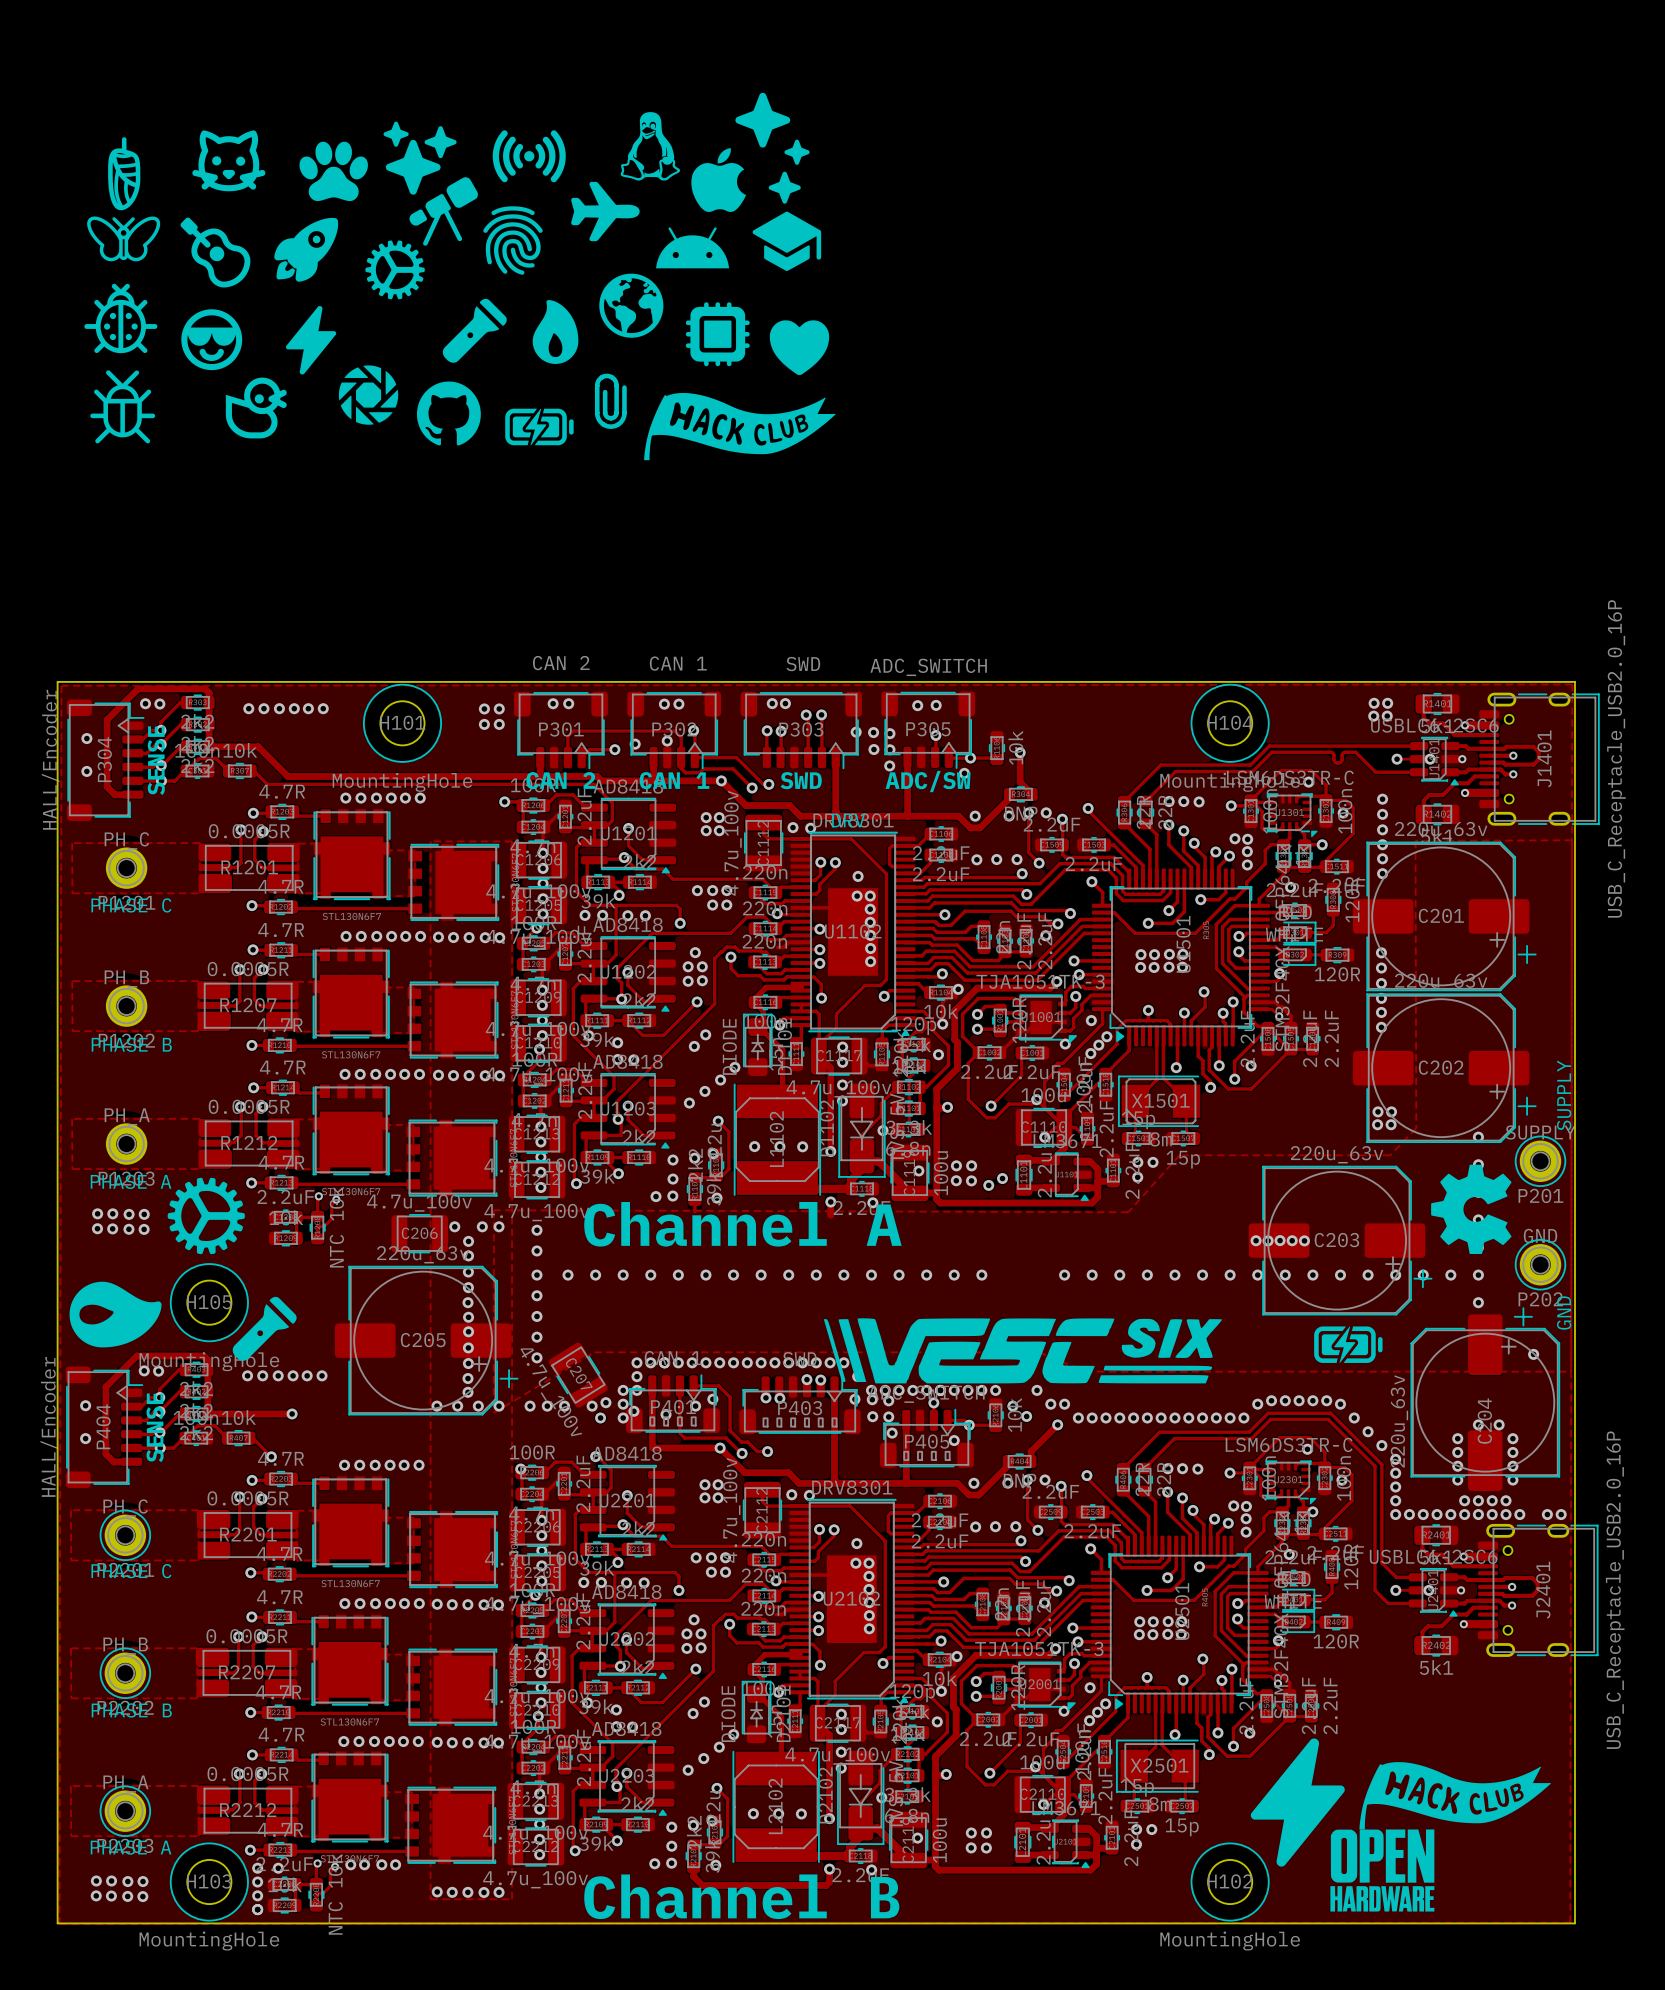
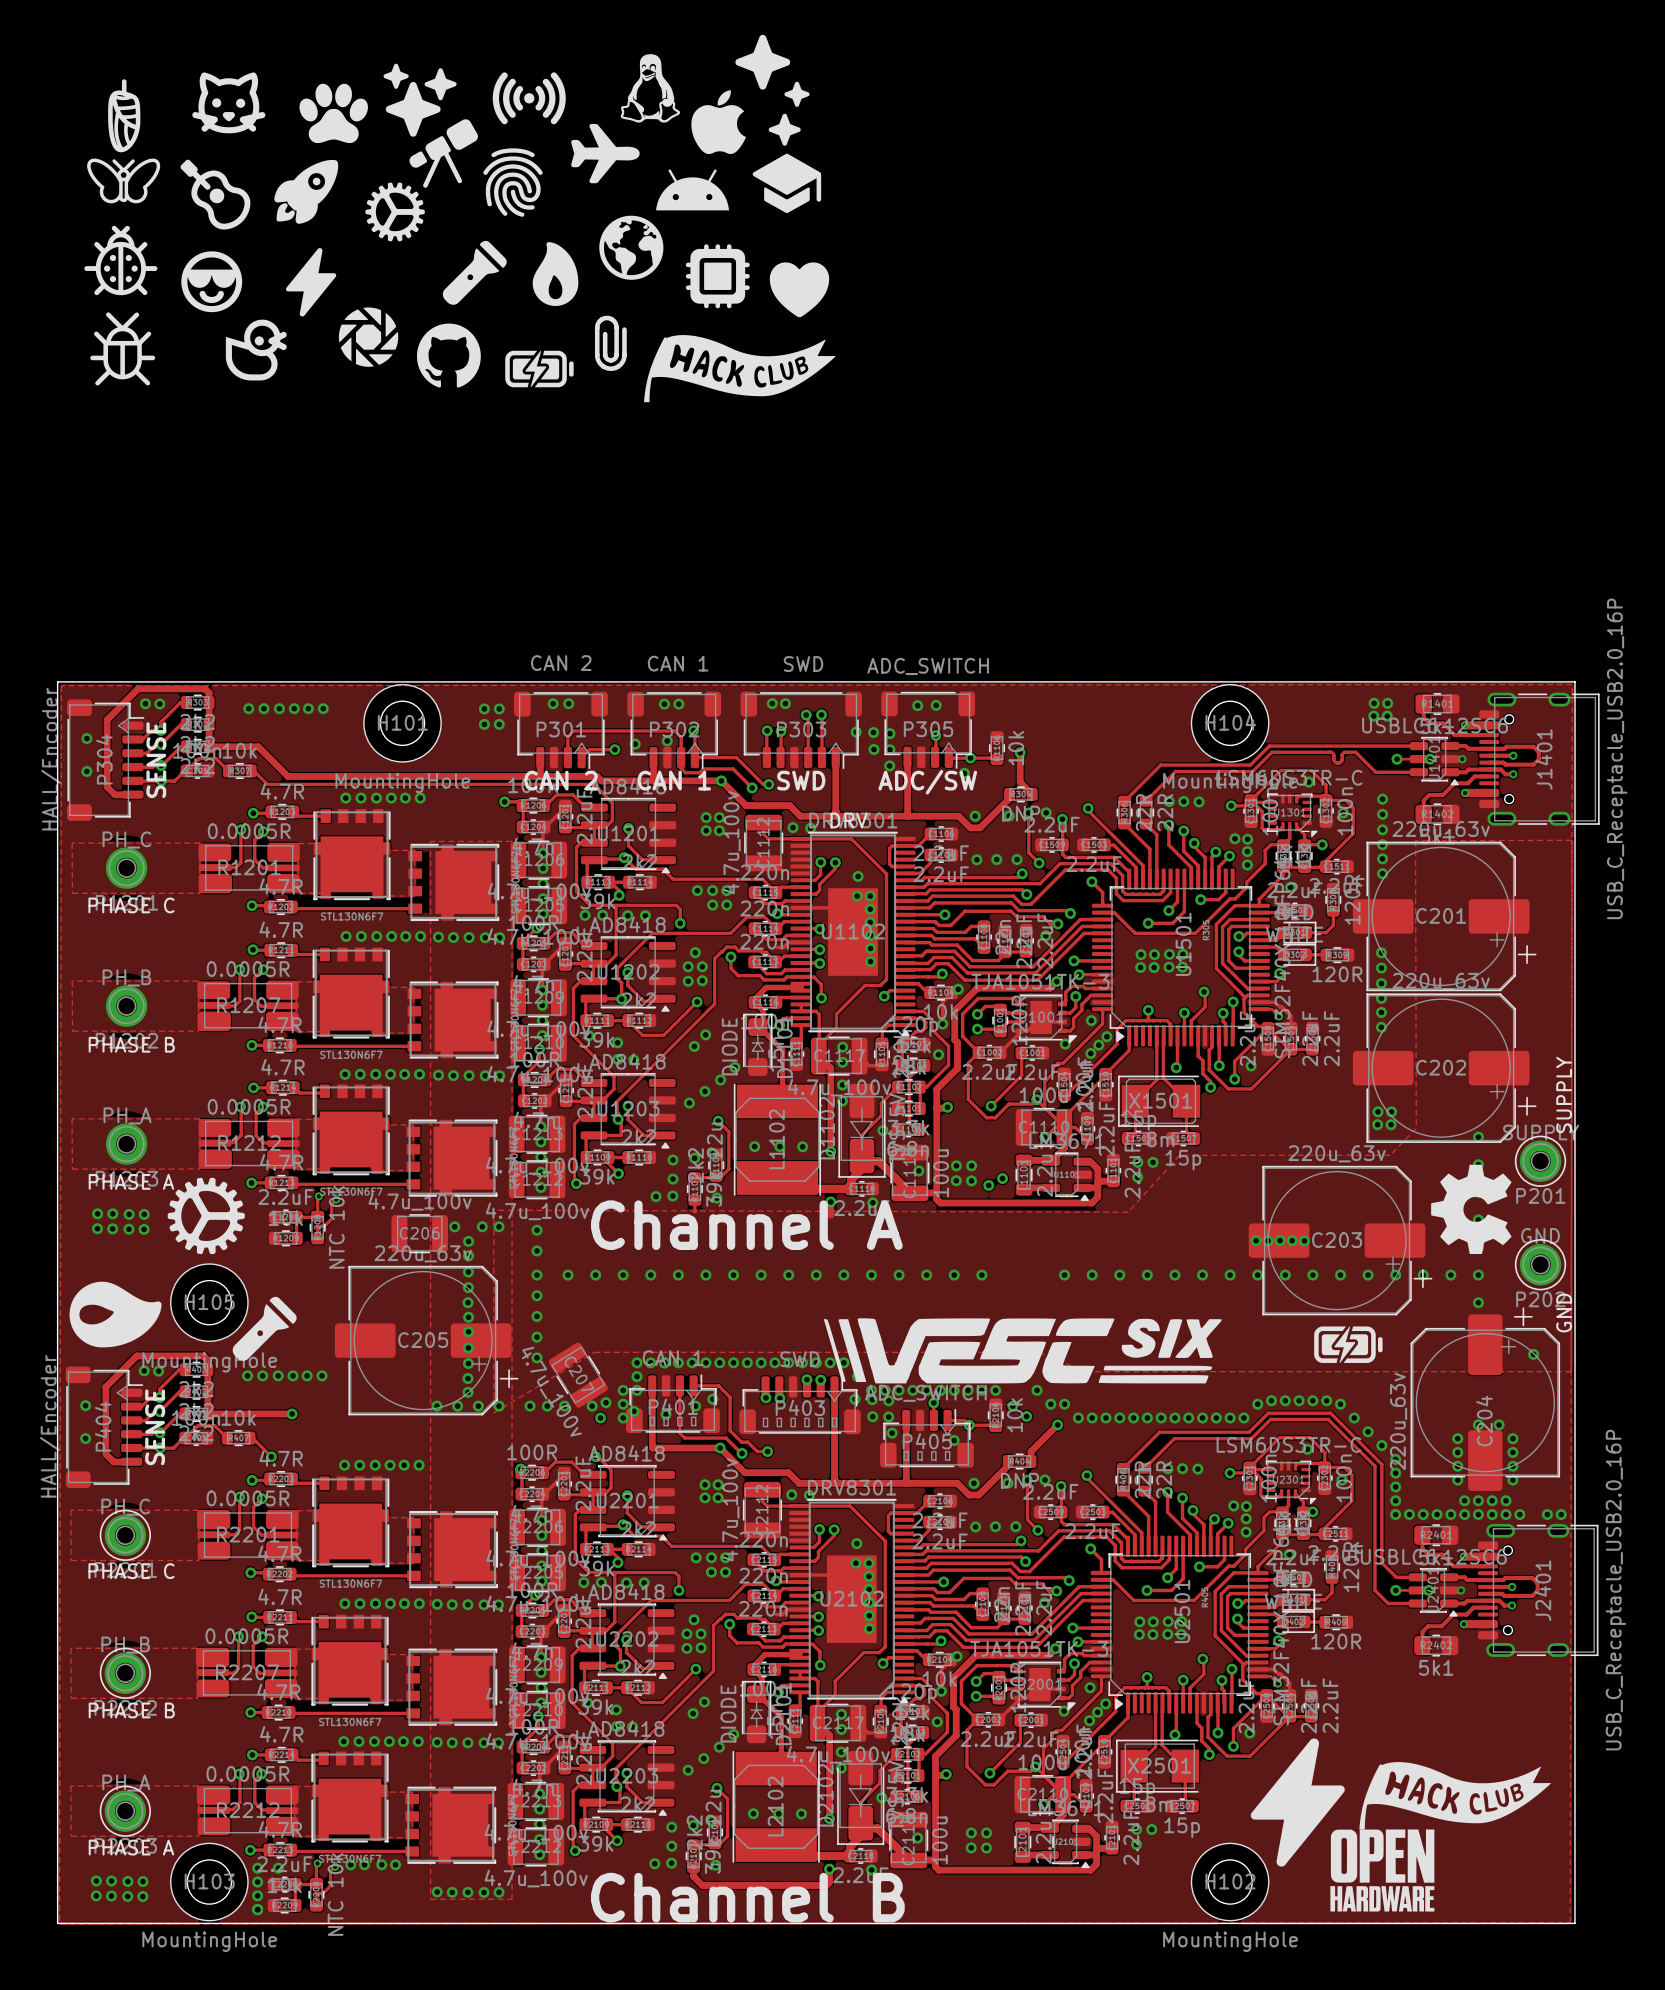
drawing: none -> [212, 98, 246, 108]
drawing position: (762, 120) -> (762, 62)
drawing position: (396, 134) -> (396, 76)
drawing position: (440, 142) -> (440, 84)
drawing position: (650, 146) -> (650, 88)
drawing position: (797, 152) -> (797, 94)
drawing position: (323, 153) -> (323, 95)
drawing position: (343, 153) -> (343, 95)
drawing position: (724, 155) -> (724, 97)
drawing: [212, 156, 246, 166] -> none
drawing position: (500, 156) -> (500, 98)
drawing position: (509, 156) -> (509, 98)
drawing position: (518, 156) -> (518, 98)
drawing position: (529, 156) -> (529, 98)
drawing position: (540, 156) -> (540, 98)
drawing position: (549, 156) -> (549, 98)
drawing position: (558, 156) -> (558, 98)
drawing position: (228, 160) -> (228, 102)
drawing position: (308, 167) -> (308, 110)
drawing position: (358, 167) -> (358, 110)
drawing position: (413, 167) -> (413, 109)
drawing position: (124, 173) -> (124, 115)
drawing position: (228, 174) -> (228, 116)
drawing position: (333, 183) -> (333, 125)
drawing position: (718, 187) -> (718, 129)
drawing position: (784, 187) -> (784, 129)
drawing position: (462, 192) -> (462, 134)
drawing position: (513, 210) -> (513, 152)
drawing position: (605, 211) -> (605, 153)
drawing position: (418, 217) -> (418, 159)
drawing position: (442, 219) -> (442, 161)
drawing position: (513, 223) -> (513, 165)
drawing position: (786, 235) -> (786, 177)
drawing position: (123, 238) -> (123, 180)
drawing position: (316, 239) -> (316, 181)
drawing position: (692, 247) -> (692, 189)
drawing position: (513, 248) -> (513, 190)
drawing position: (306, 249) -> (306, 191)
drawing position: (215, 252) -> (215, 194)
drawing position: (512, 252) -> (512, 194)
drawing position: (216, 253) -> (216, 195)
drawing: none -> [104, 254, 138, 283]
drawing position: (522, 257) -> (522, 199)
drawing position: (786, 258) -> (786, 200)
drawing position: (395, 269) -> (395, 211)
drawing position: (285, 270) -> (285, 212)
drawing position: (631, 305) -> (631, 247)
drawing: [104, 312, 138, 341] -> none
drawing position: (493, 312) -> (493, 254)
drawing position: (120, 318) -> (120, 260)
drawing position: (555, 332) -> (555, 274)
drawing position: (470, 334) -> (470, 276)
drawing position: (717, 334) -> (717, 276)
drawing position: (717, 334) -> (717, 276)
drawing position: (211, 339) -> (211, 281)
drawing position: (311, 340) -> (311, 282)
drawing position: (799, 347) -> (799, 289)
drawing position: (211, 354) -> (211, 296)
drawing position: (356, 372) -> (356, 314)
drawing position: (372, 374) -> (372, 316)
drawing position: (390, 382) -> (390, 324)
line: (624, 387) (624, 416) (620, 422) (614, 426) (603, 424) (597, 414) (597, 382) (602, 377) (609, 376) (614, 379) (616, 385) (616, 413) (612, 418) (608, 417) (605, 414) (605, 392) -> (624, 329) (624, 358) (620, 364) (614, 368) (603, 366) (597, 356) (597, 324) (602, 319) (609, 318) (614, 321) (616, 327) (616, 355) (612, 360) (608, 359) (605, 356) (605, 334)
drawing position: (347, 391) -> (347, 333)
drawing position: (368, 395) -> (368, 337)
drawing position: (259, 398) -> (259, 340)
drawing position: (389, 398) -> (389, 340)
drawing position: (122, 406) -> (122, 348)
drawing position: (346, 407) -> (346, 349)
drawing position: (256, 408) -> (256, 350)
drawing position: (448, 413) -> (448, 355)
drawing position: (364, 415) -> (364, 357)
drawing position: (380, 417) -> (380, 359)
drawing position: (703, 418) -> (703, 360)
drawing position: (800, 420) -> (800, 362)
drawing position: (743, 423) -> (743, 365)
drawing position: (521, 426) -> (521, 369)
drawing position: (522, 426) -> (522, 369)
drawing position: (535, 426) -> (535, 369)
drawing position: (549, 426) -> (549, 369)
drawing position: (550, 426) -> (550, 369)
drawing position: (571, 426) -> (571, 369)
drawing position: (655, 427) -> (655, 369)
drawing position: (802, 427) -> (802, 369)

